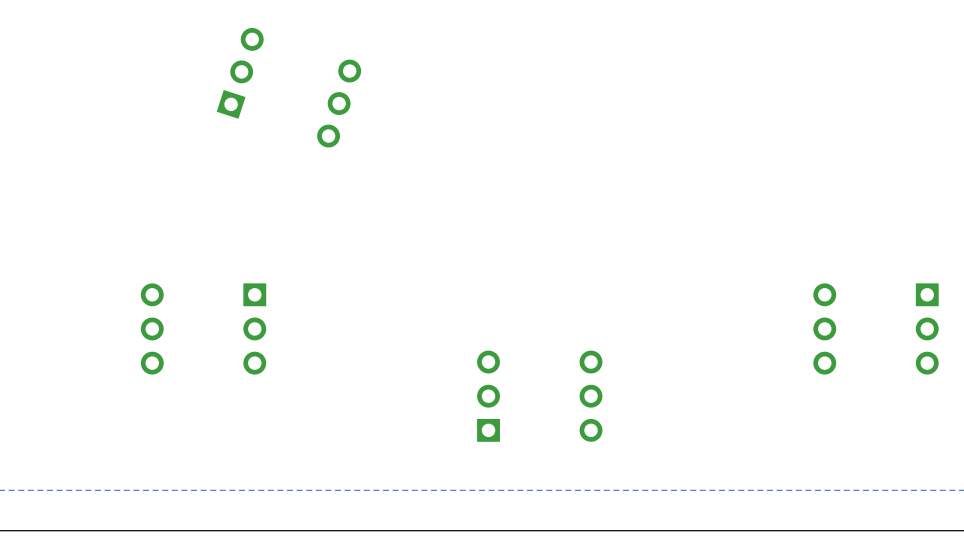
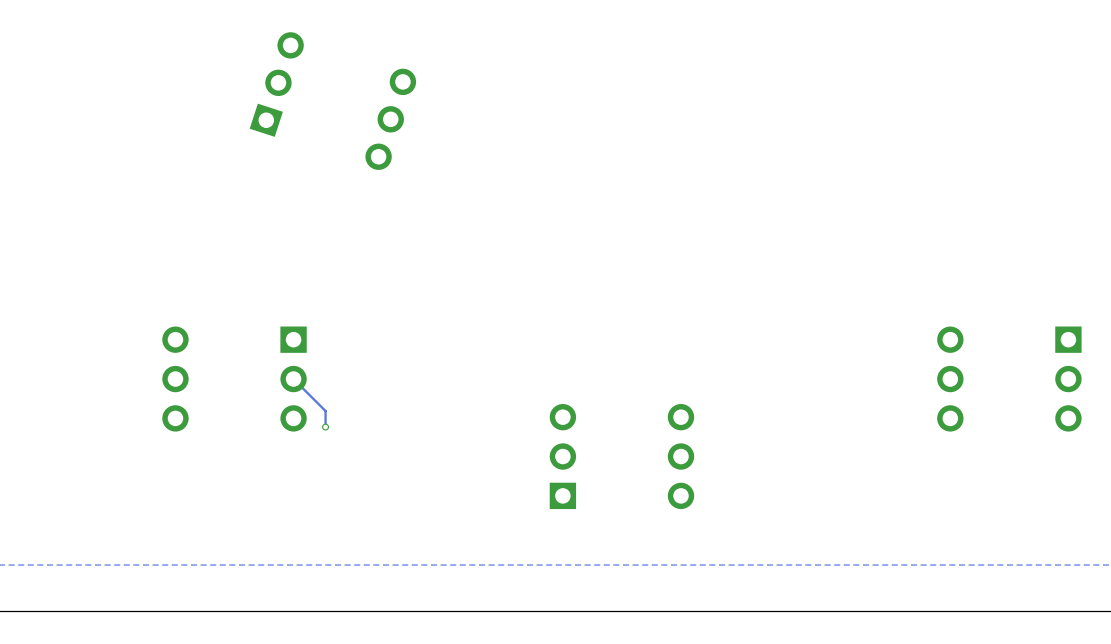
track: none -> (293, 379) (325, 411) (325, 427)
via: none -> (325, 427)

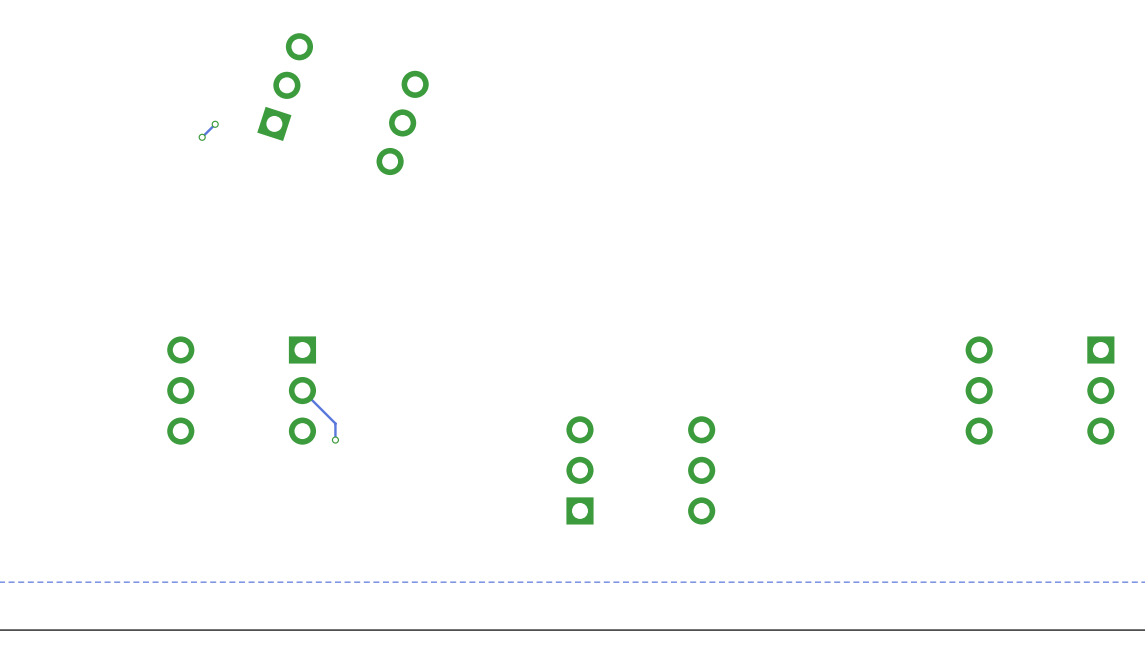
track: none -> (215, 124) (202, 137)
via: none -> (215, 124)
via: none -> (202, 137)

